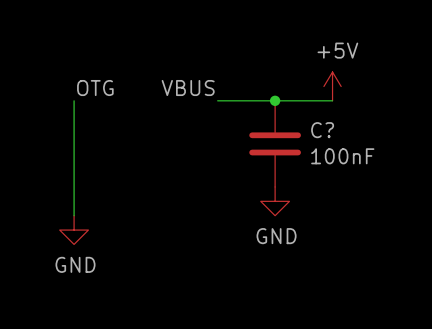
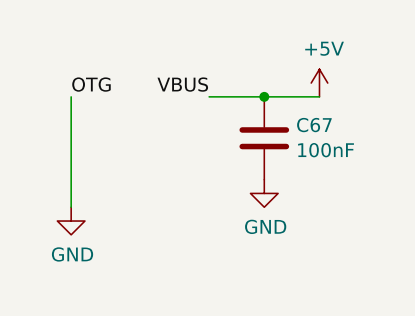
C? name: C? (322, 130) -> C67 (314, 125)

